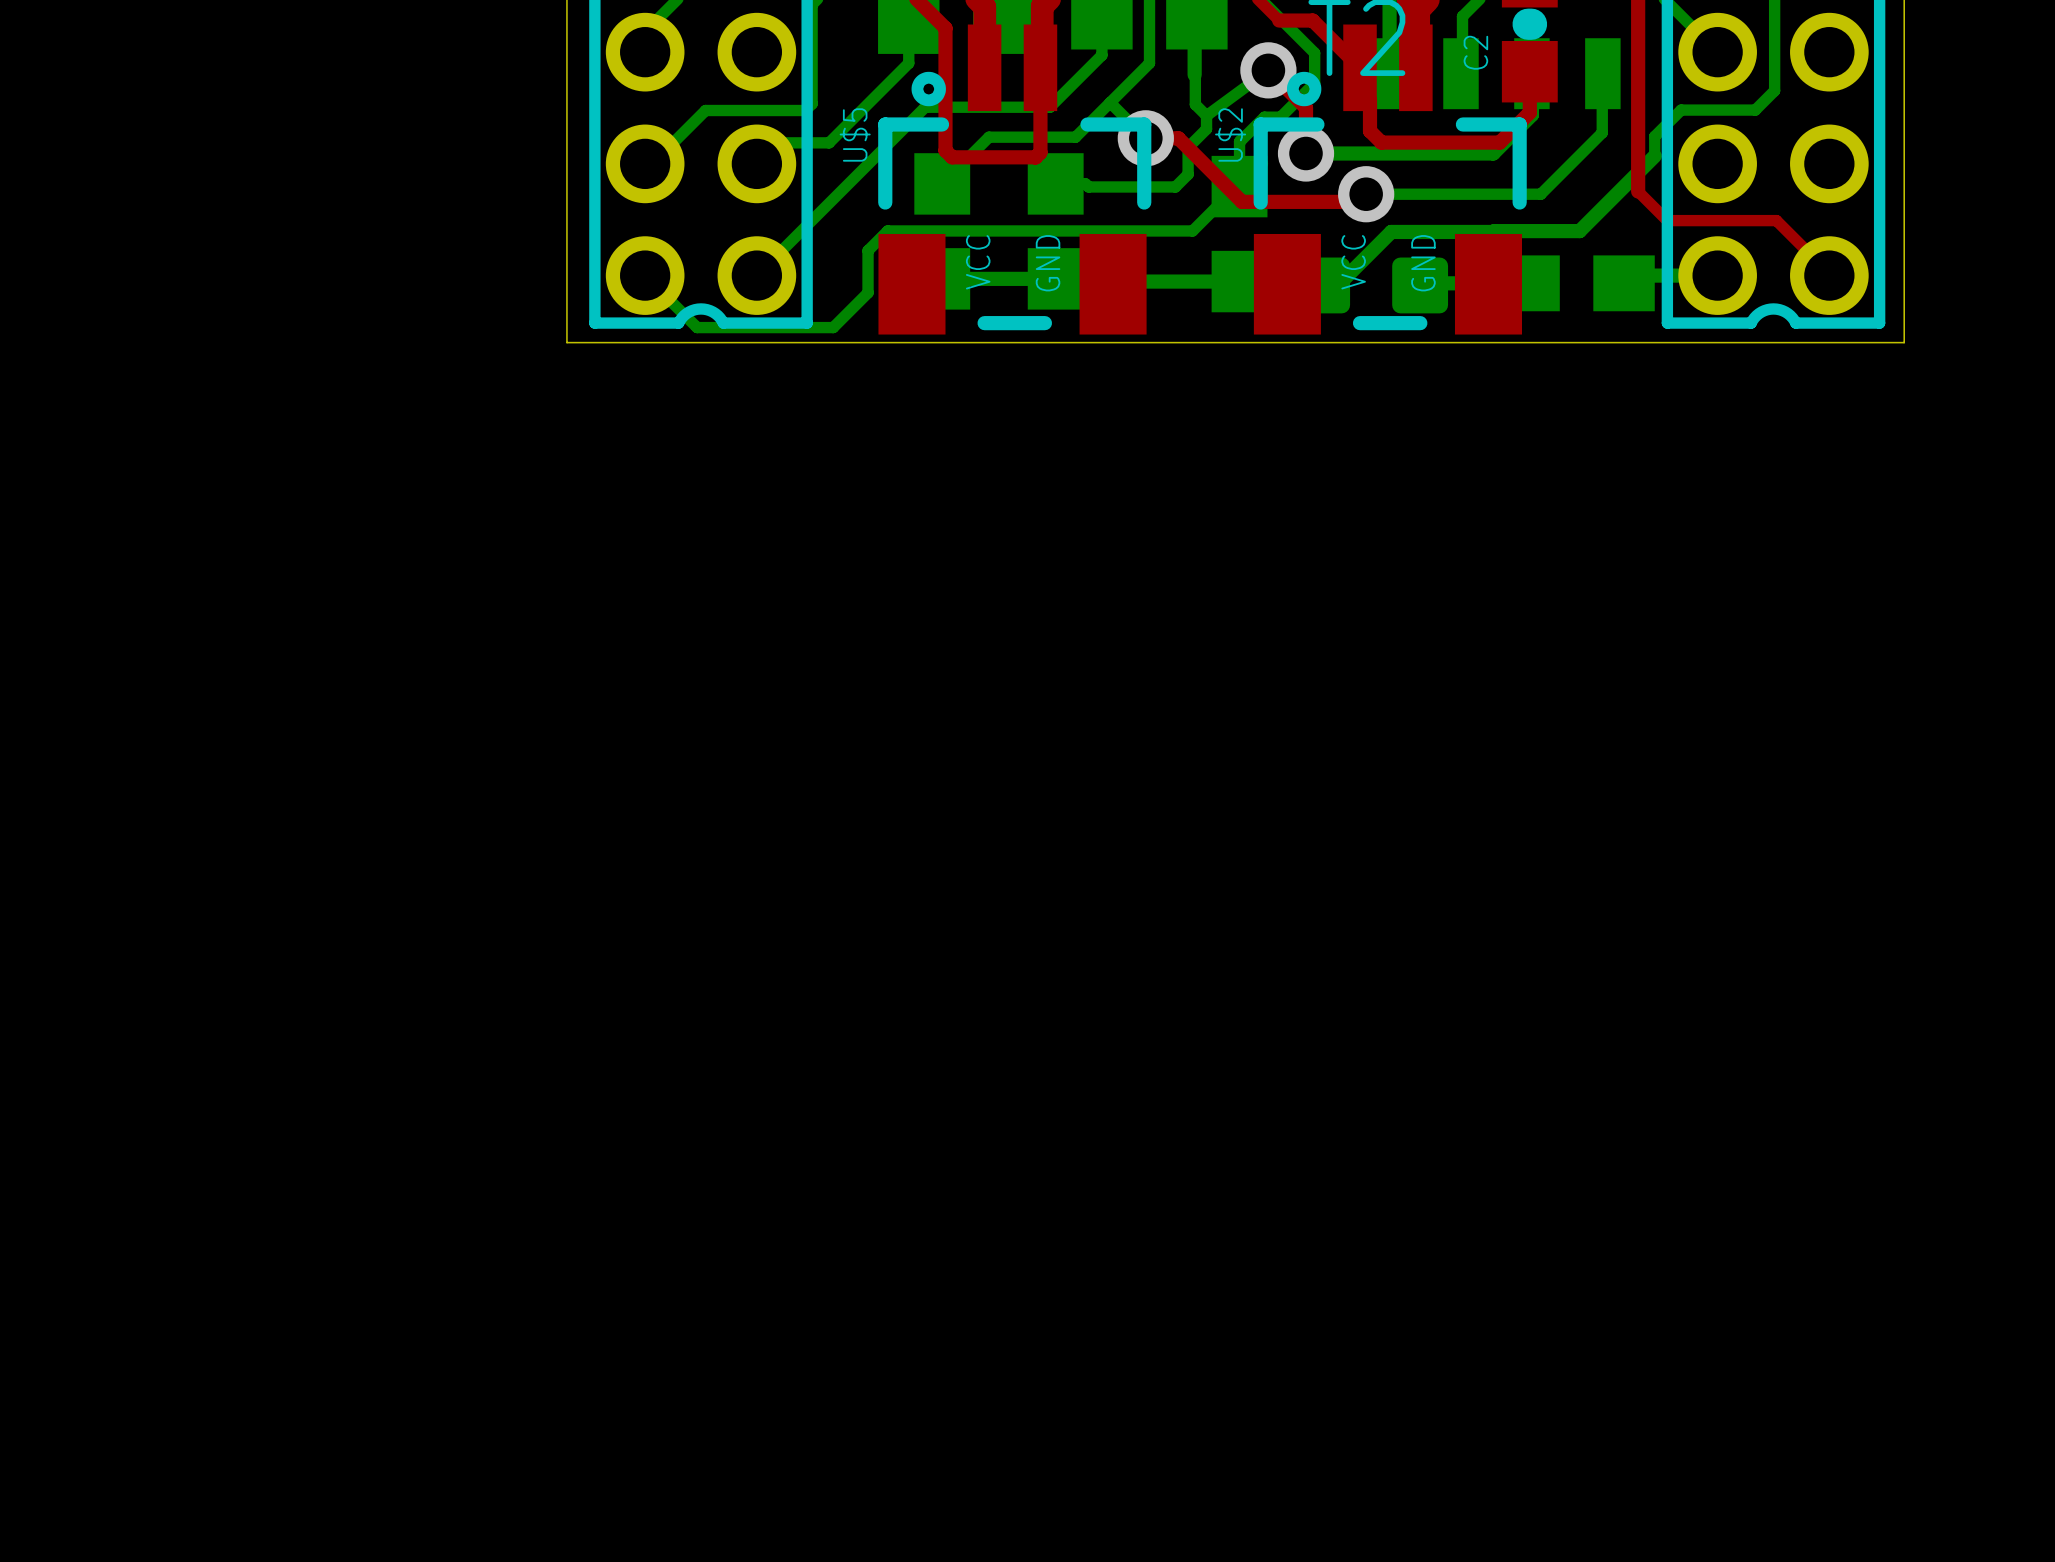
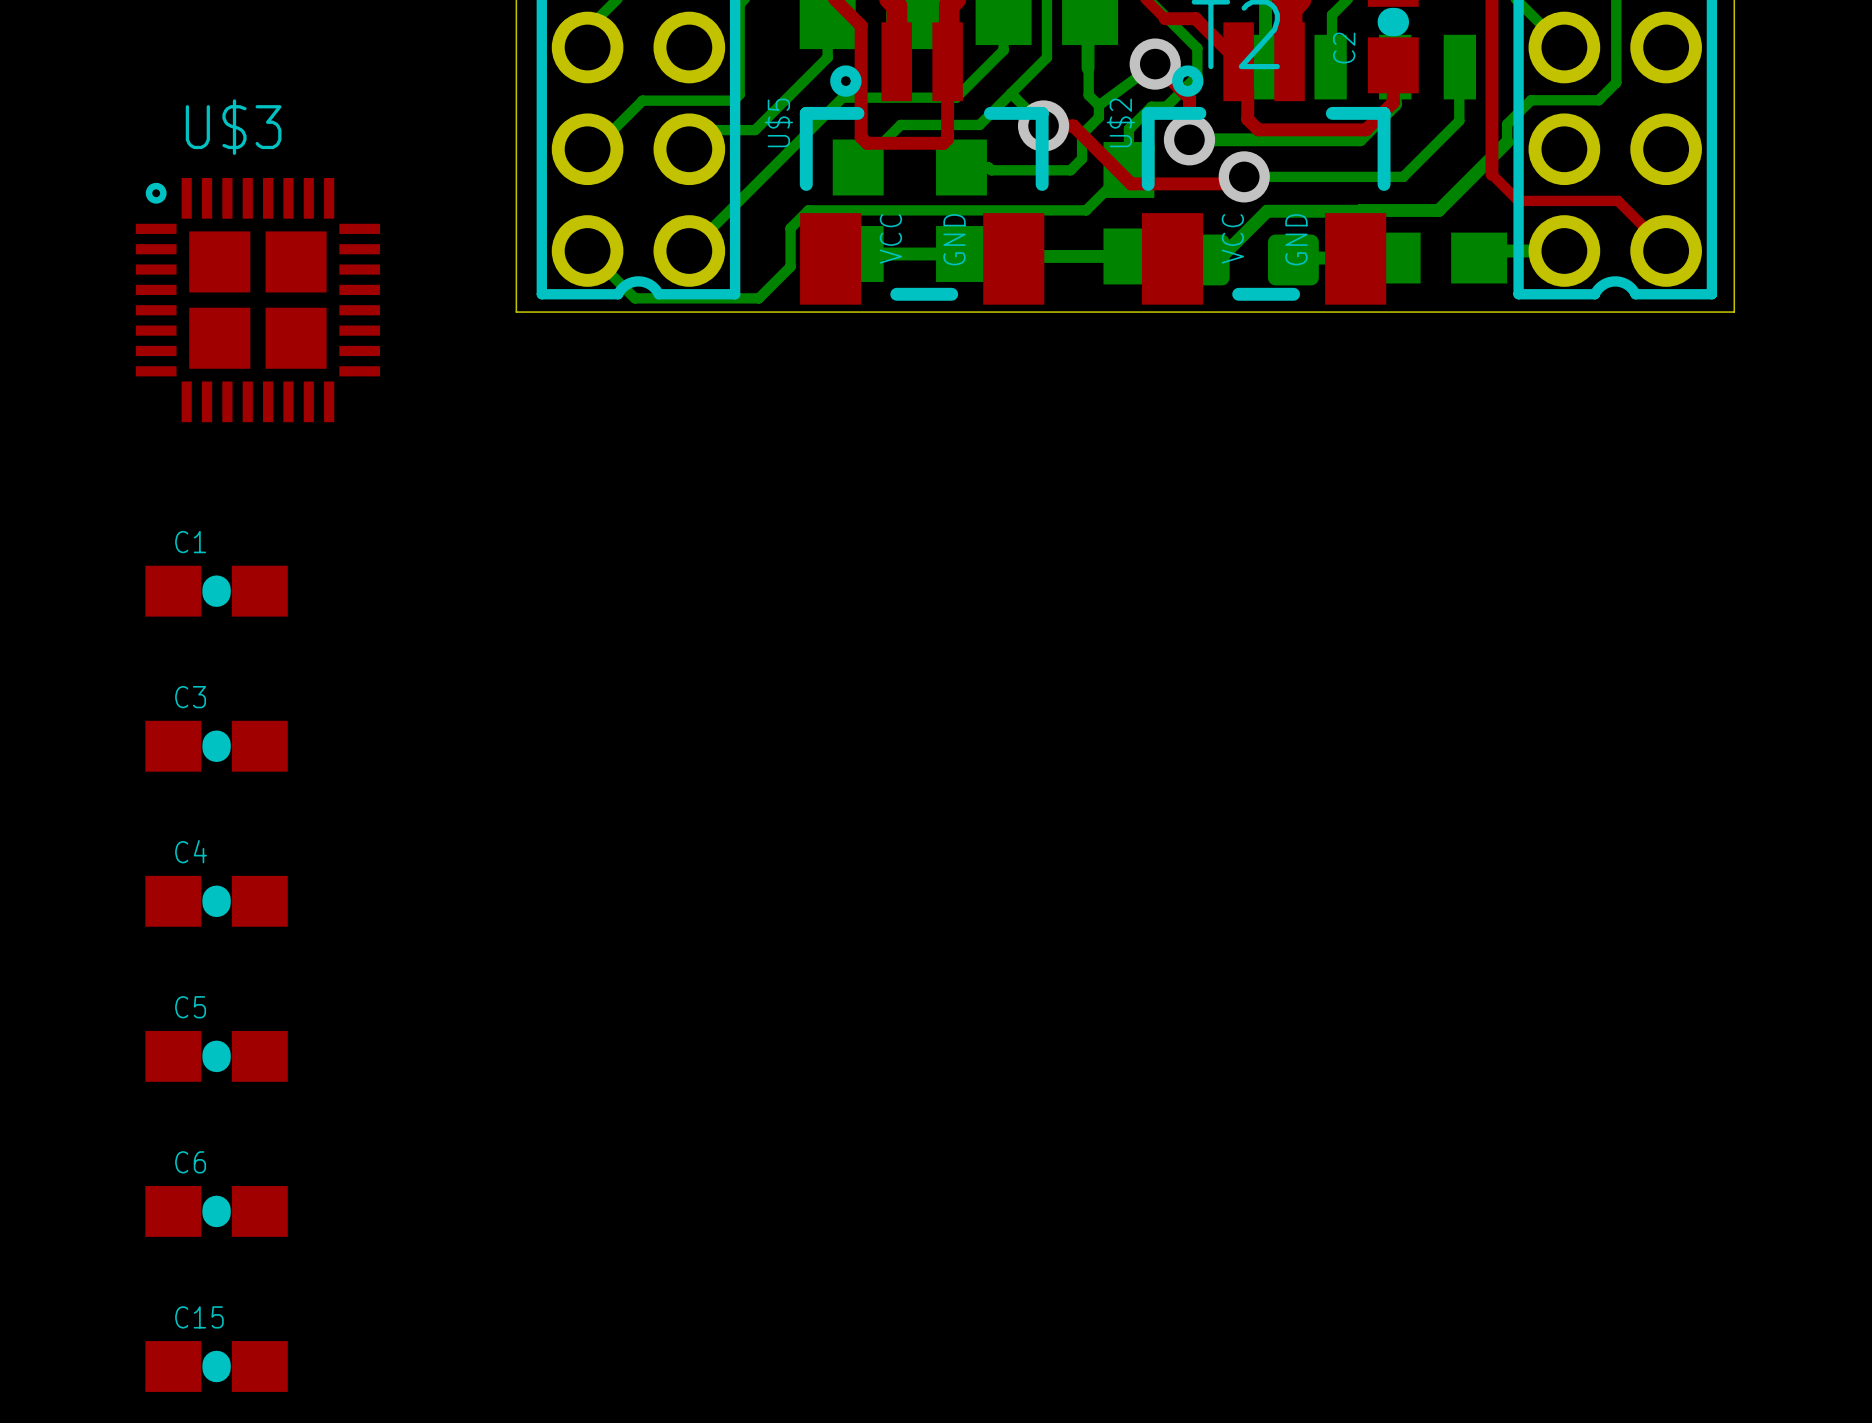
U$3: none -> (257, 300)
C1: none -> (216, 591)
C3: none -> (216, 746)
C4: none -> (216, 901)
C5: none -> (216, 1056)
C6: none -> (216, 1211)
C15: none -> (216, 1366)

